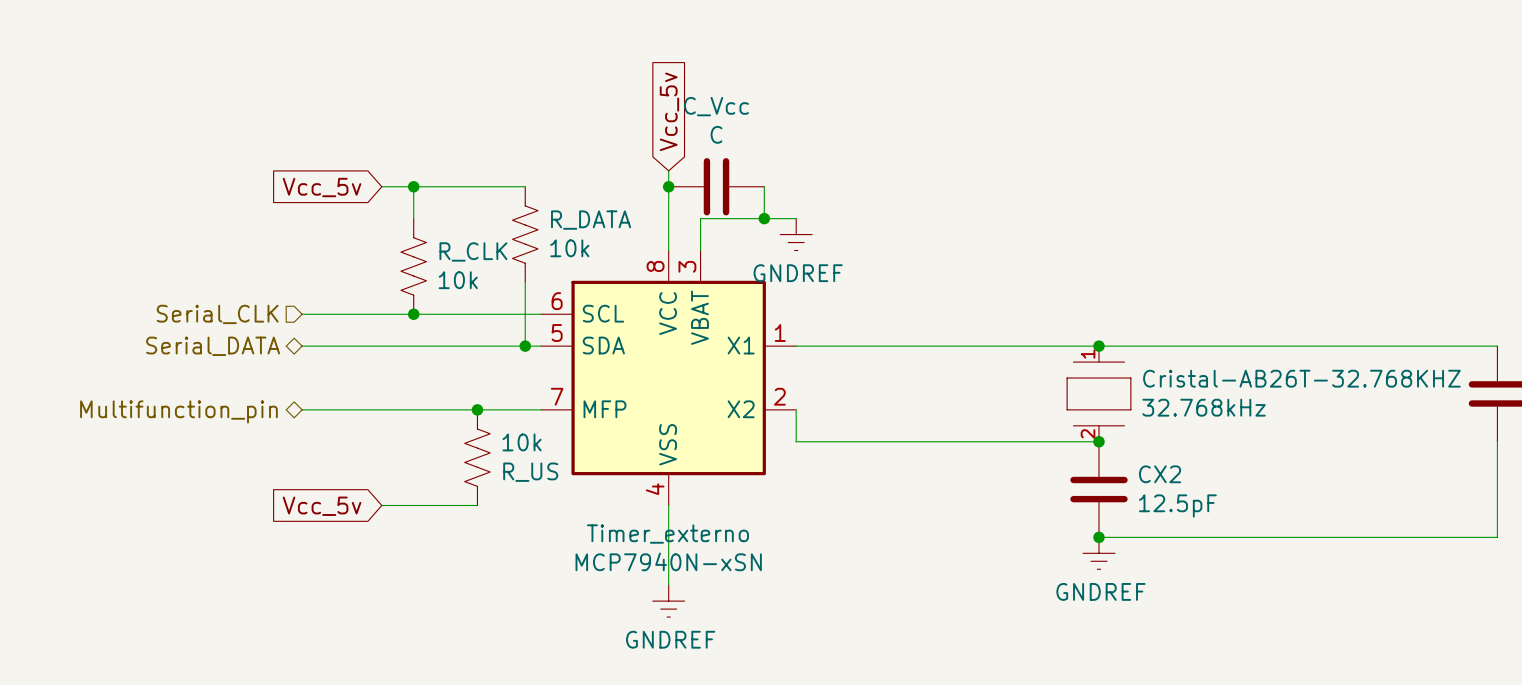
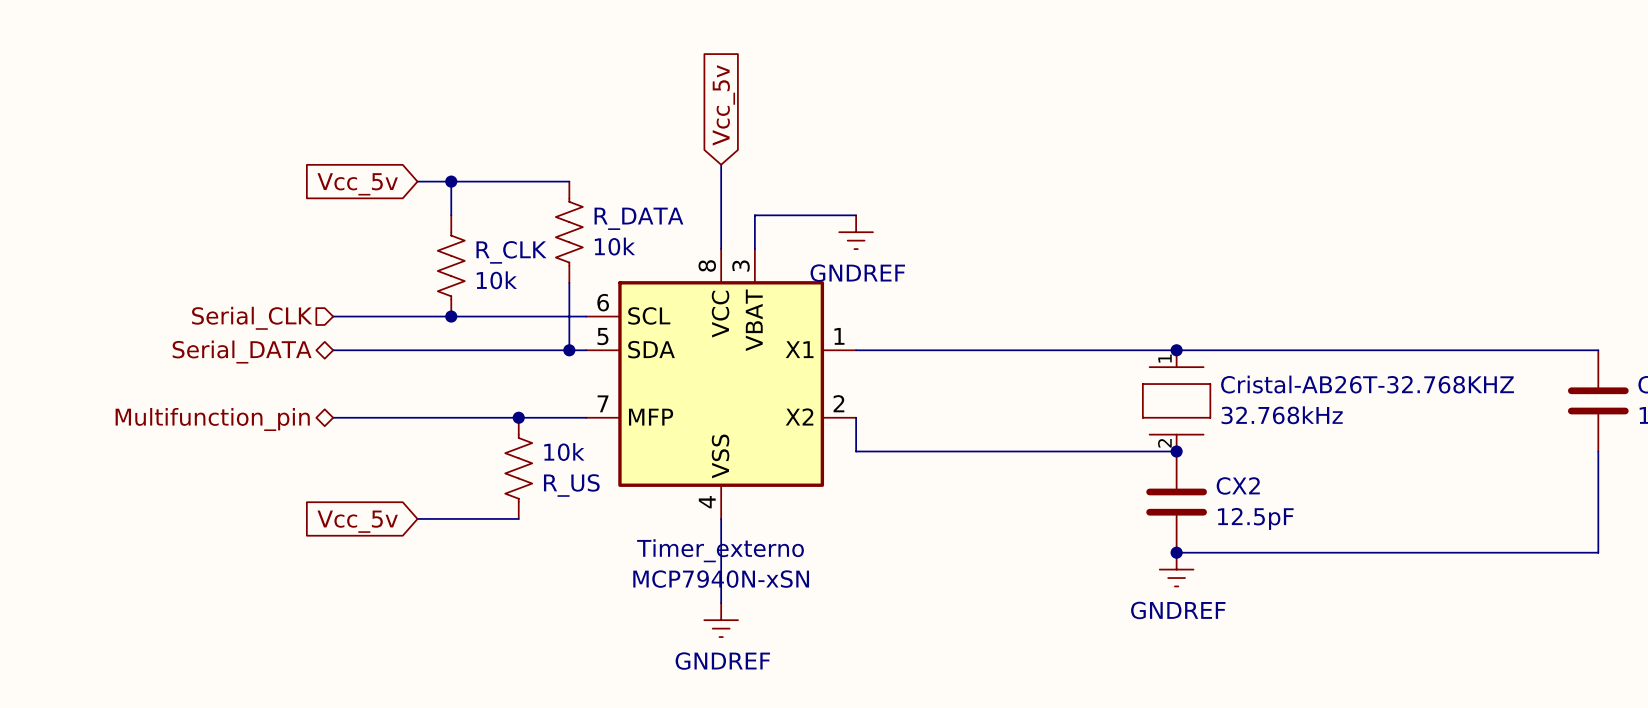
junction: (668, 186) -> none
C_Vcc: C (716, 186) -> none
wire: (764, 186) (764, 218) -> none
junction: (764, 218) -> none

